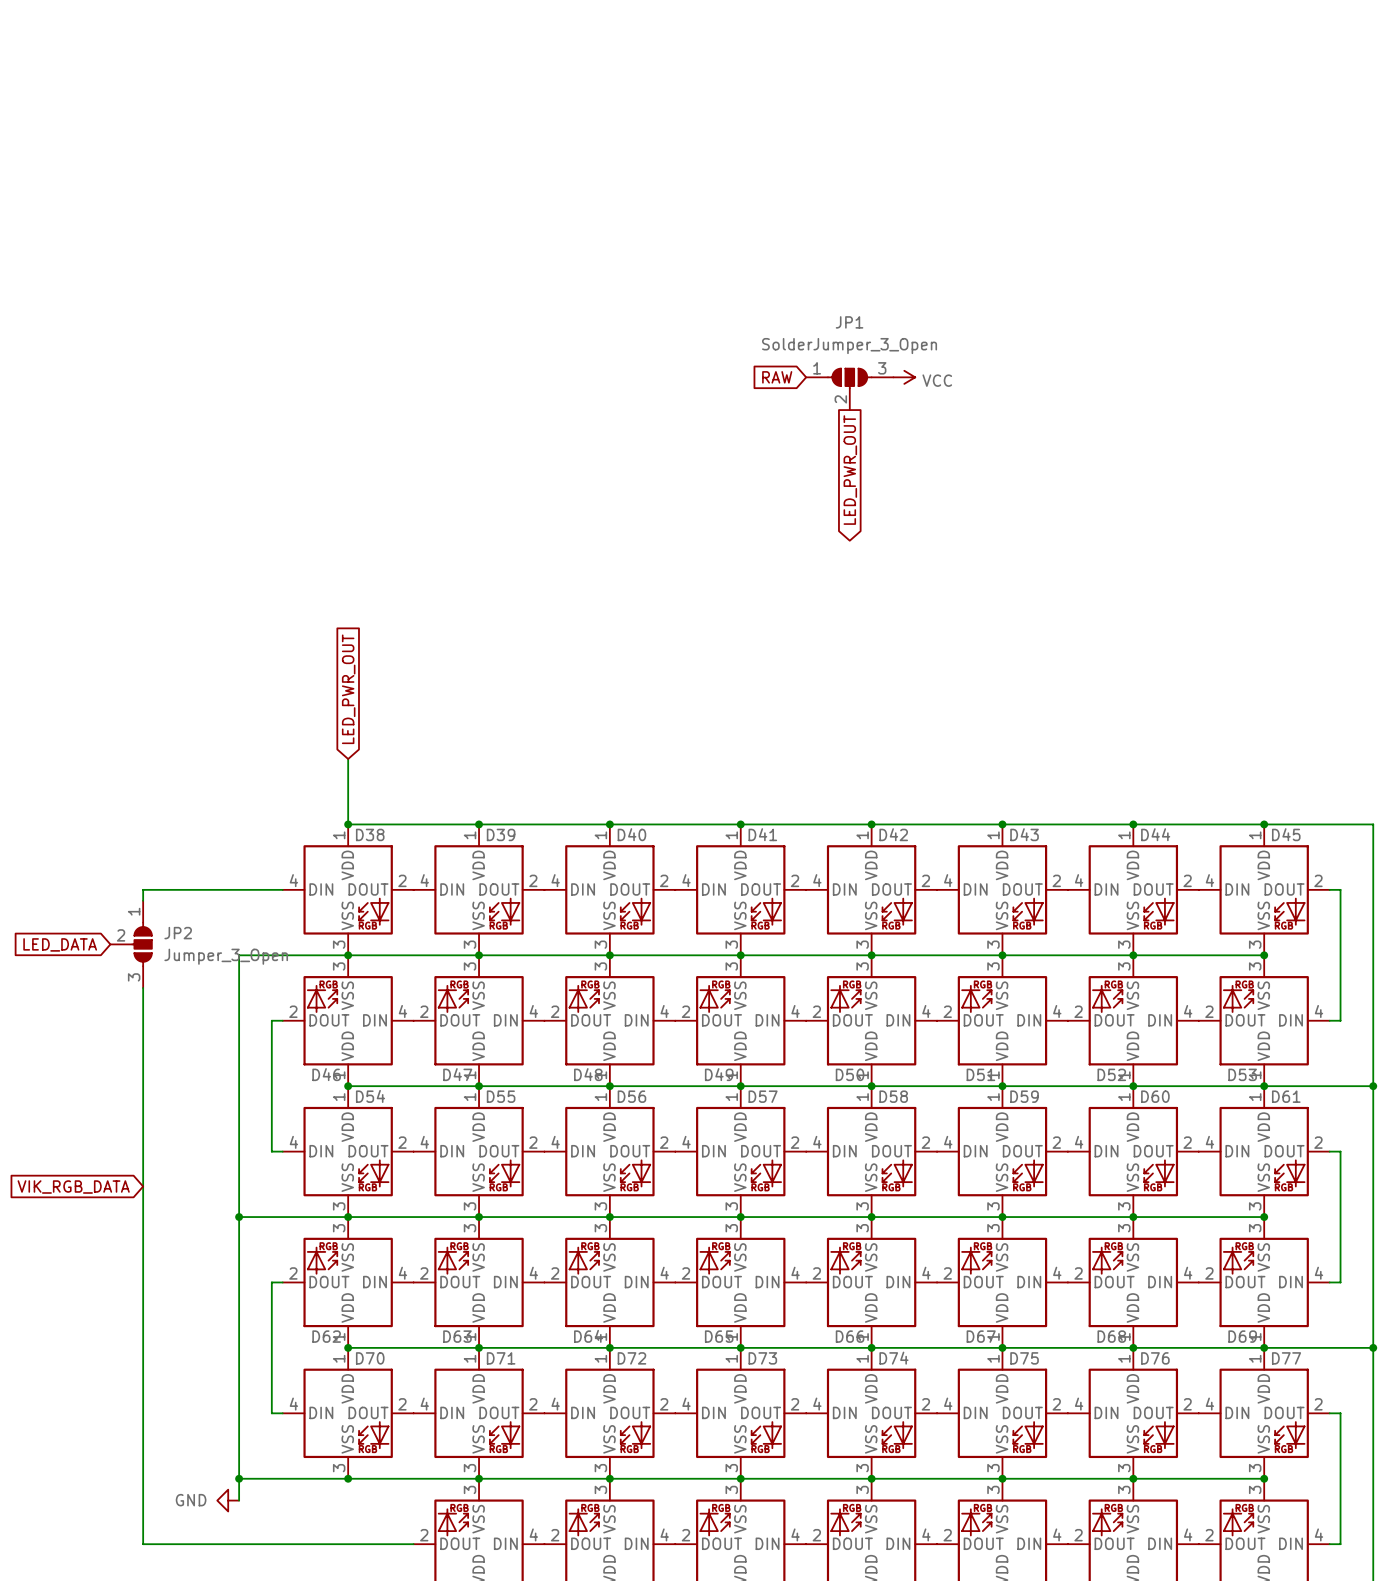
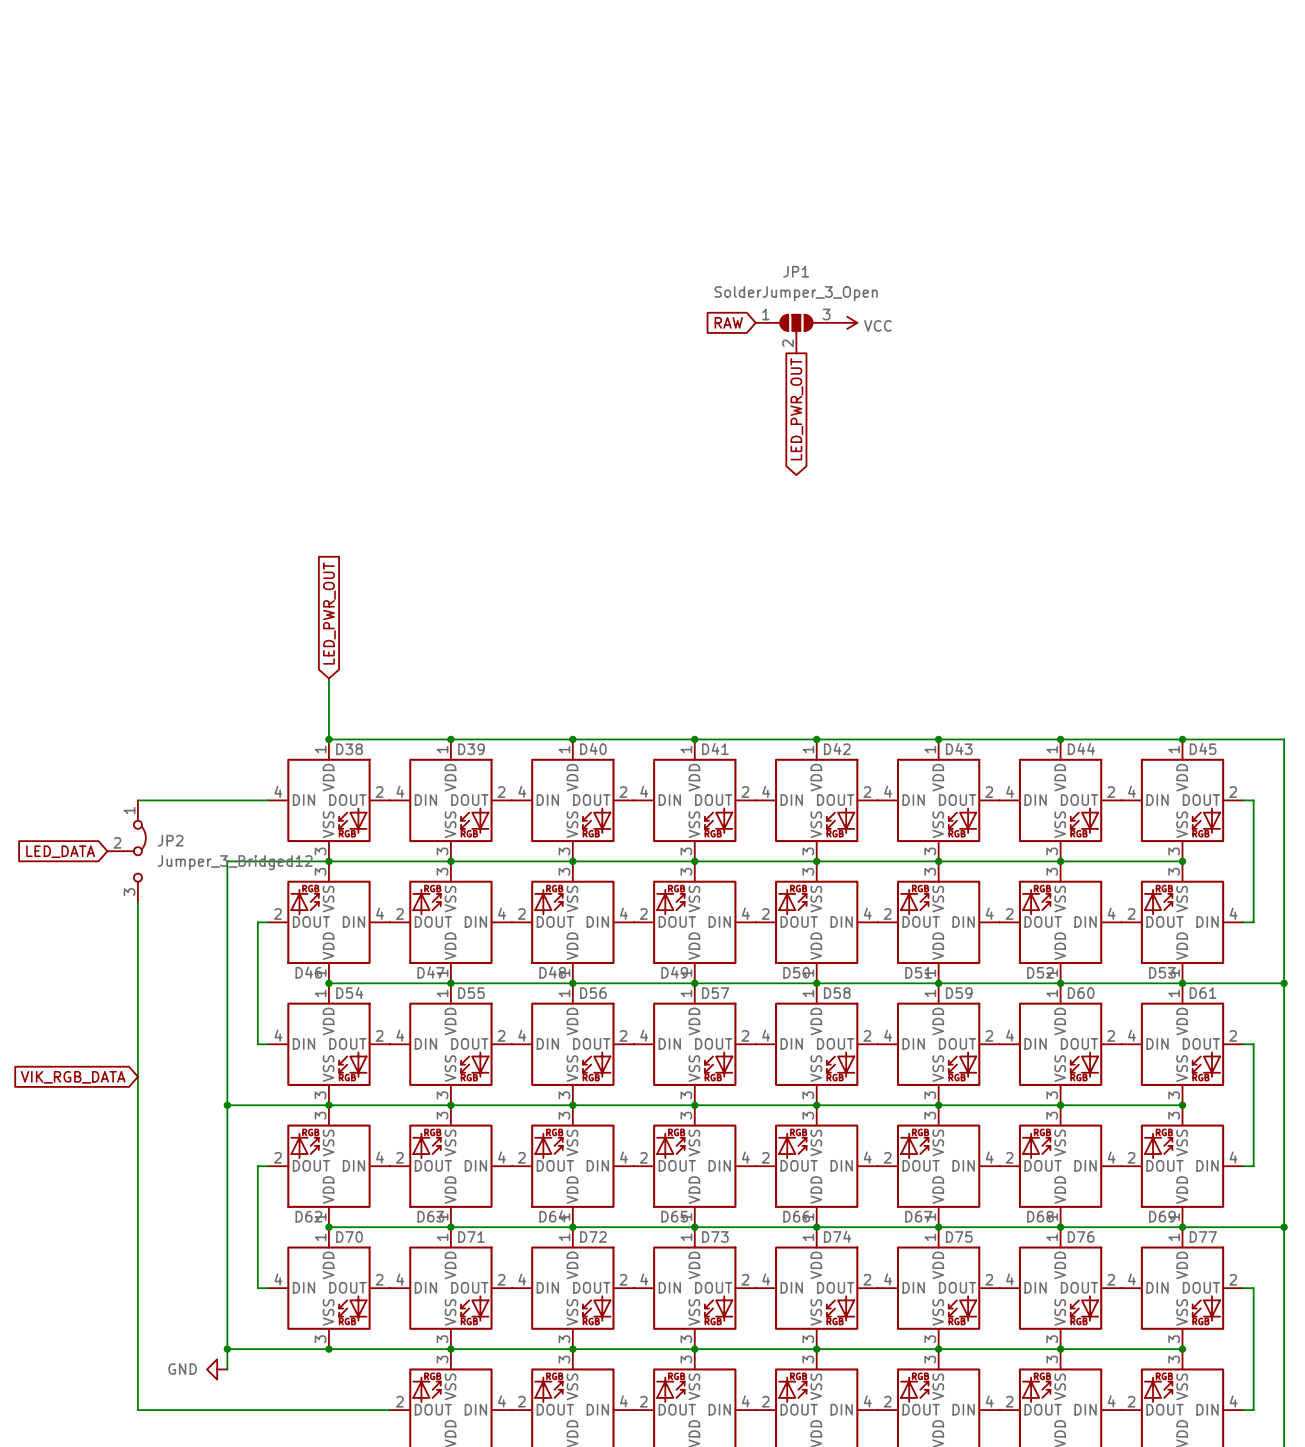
JP2 symbol: [110, 900, 152, 989] -> [107, 800, 146, 903]
JP2 value: Jumper_3_Open (226, 956) -> Jumper_3_Bridged12 (235, 862)

